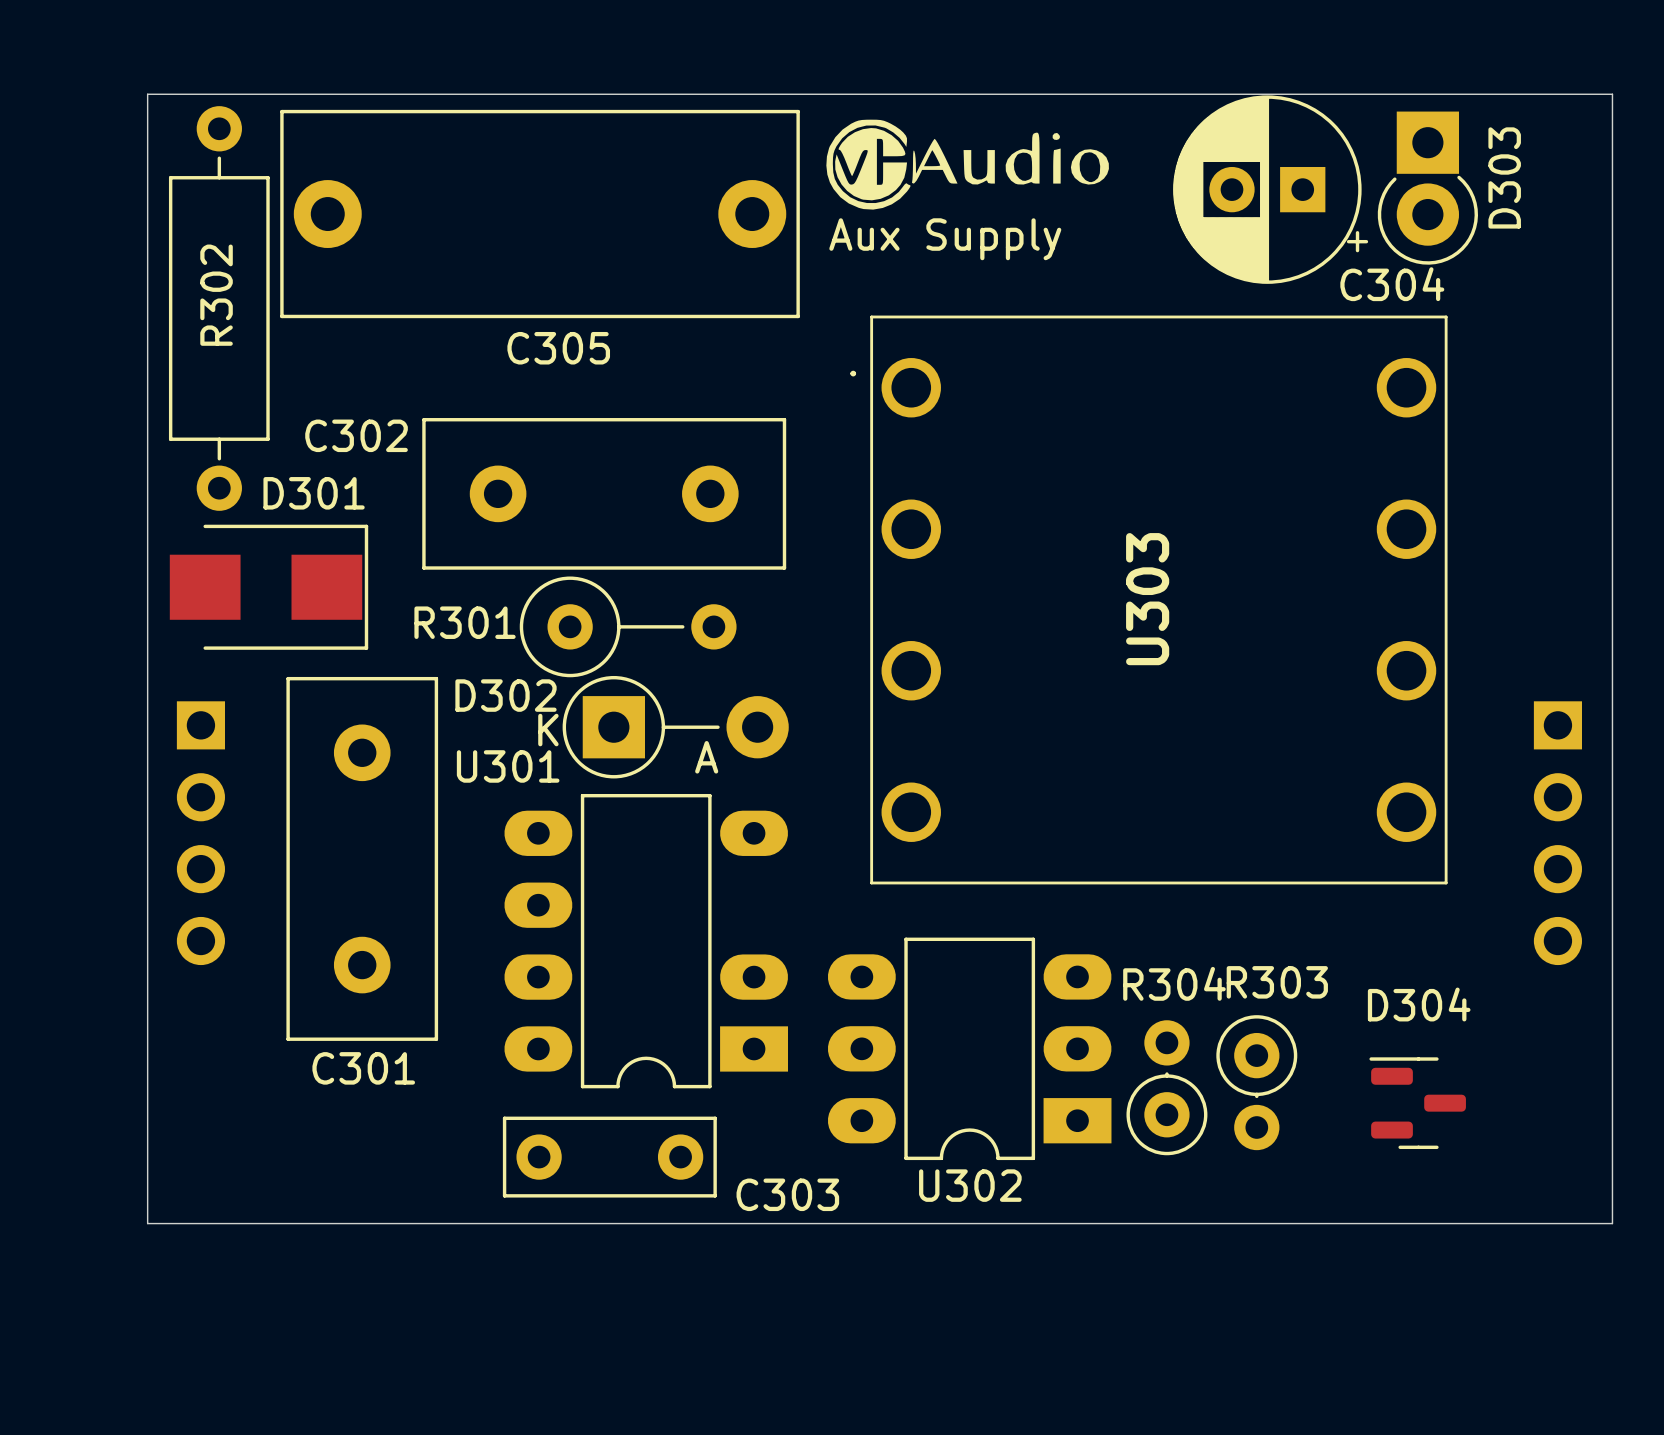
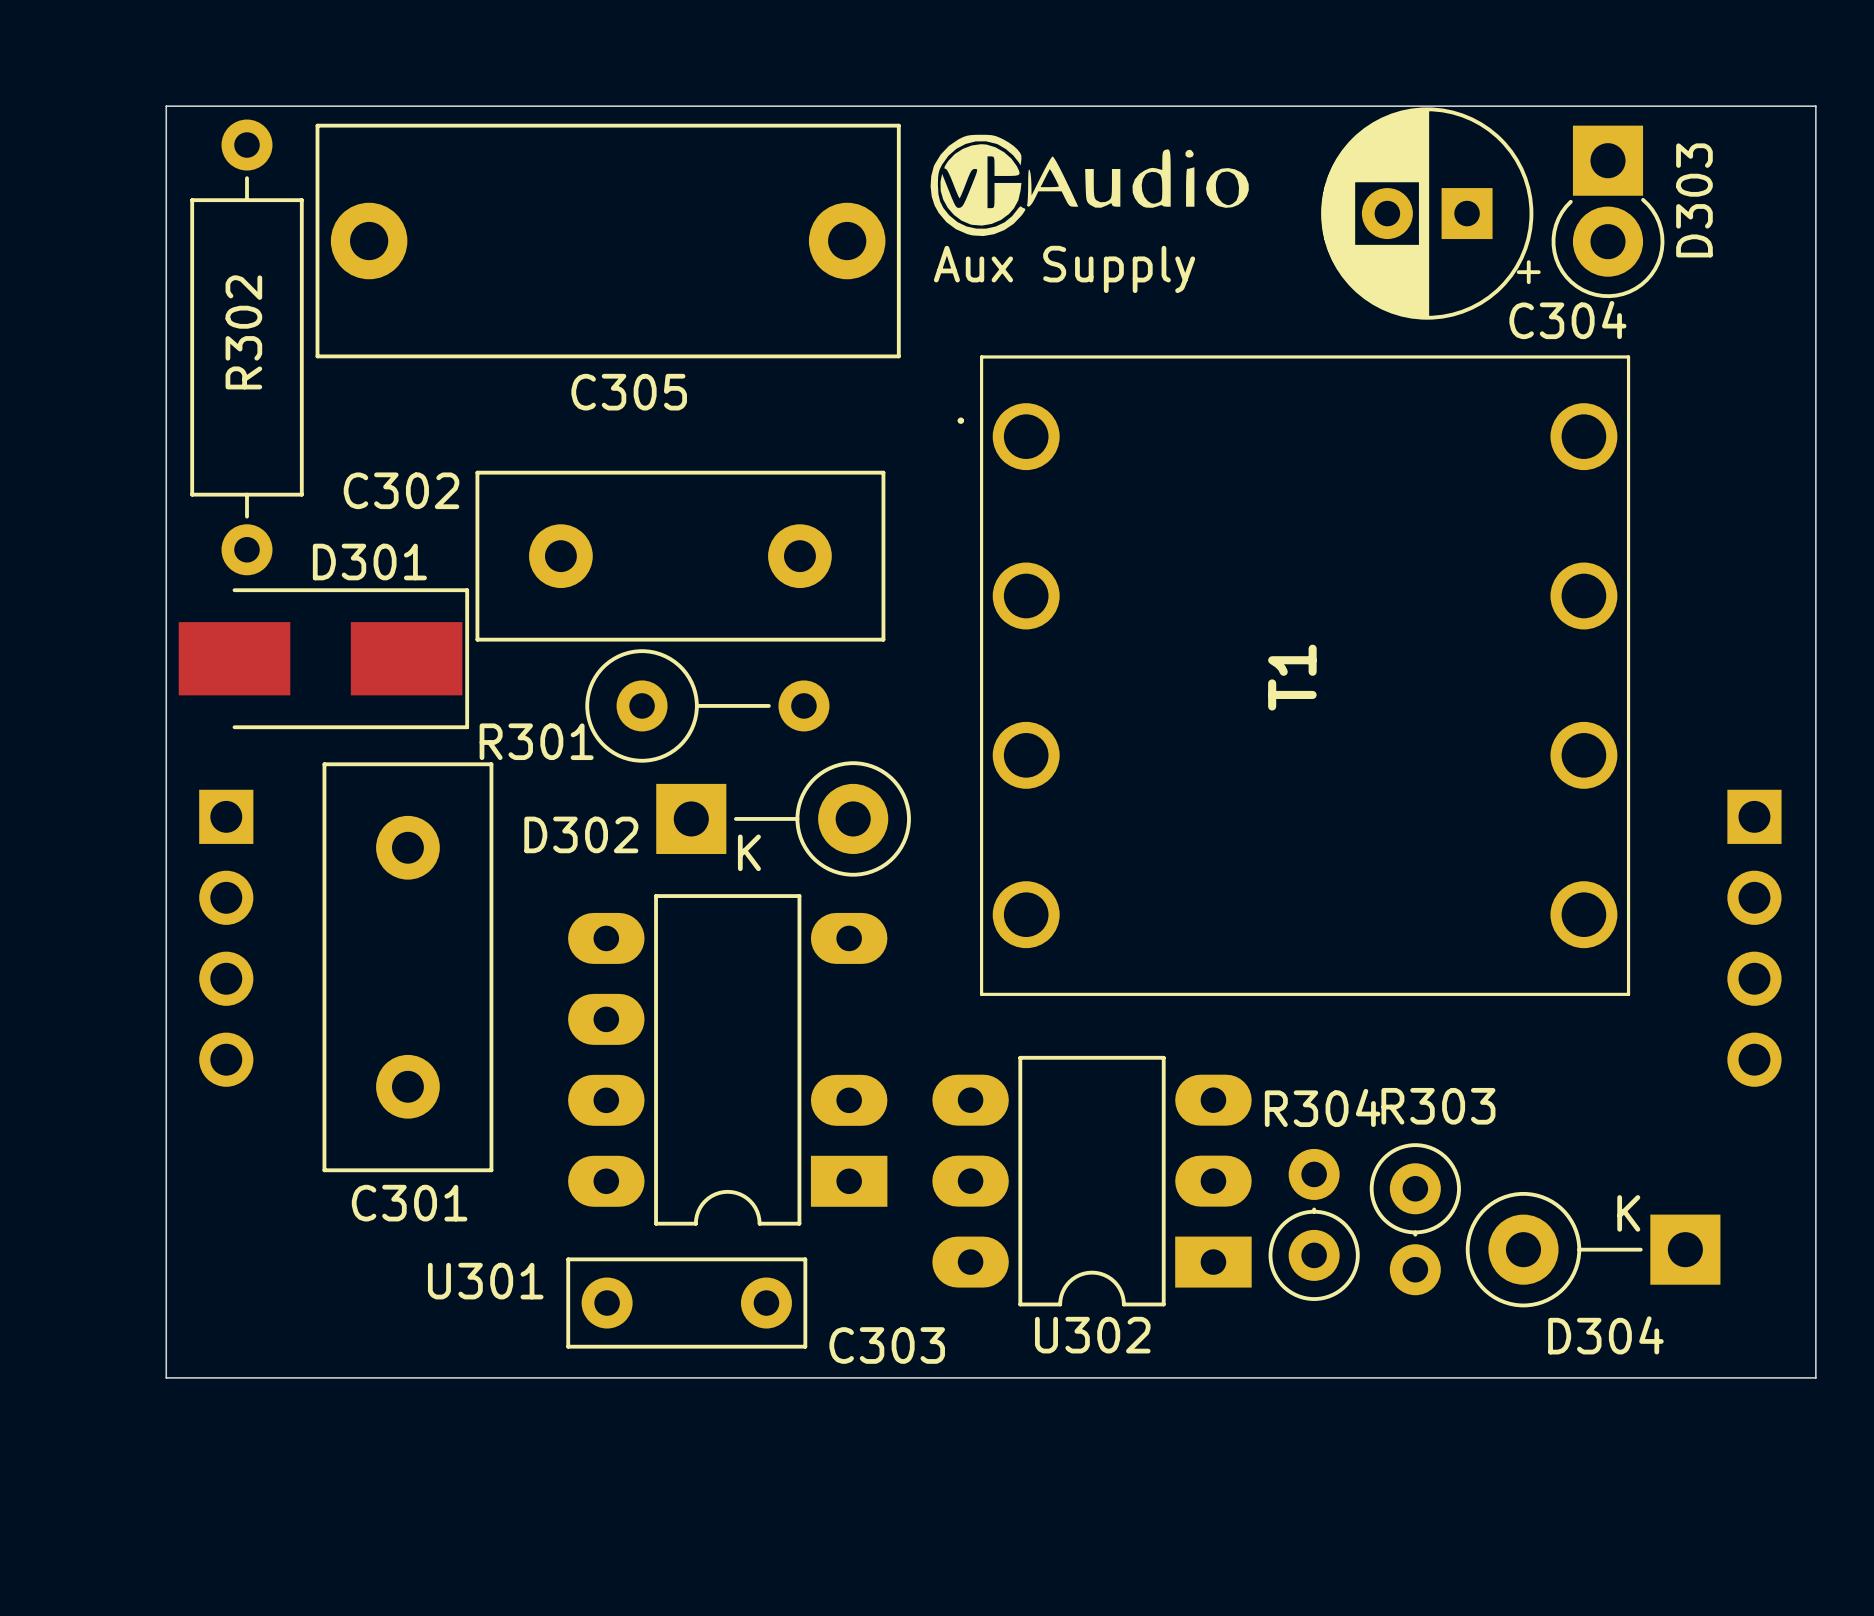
D301 footprint: [169, 524, 369, 650] -> [178, 588, 470, 730]
U303 name: U303 (1147, 599) -> T1 (1292, 677)
R301 name position: R301 (465, 622) -> R301 (536, 741)
D302 footprint: [562, 675, 789, 779] -> [656, 761, 911, 877]
U301 name position: U301 (508, 766) -> U301 (485, 1281)
D304 name position: D304 (1419, 1004) -> D304 (1605, 1335)
D304 footprint: [1369, 1057, 1466, 1150] -> [1465, 1191, 1721, 1308]

